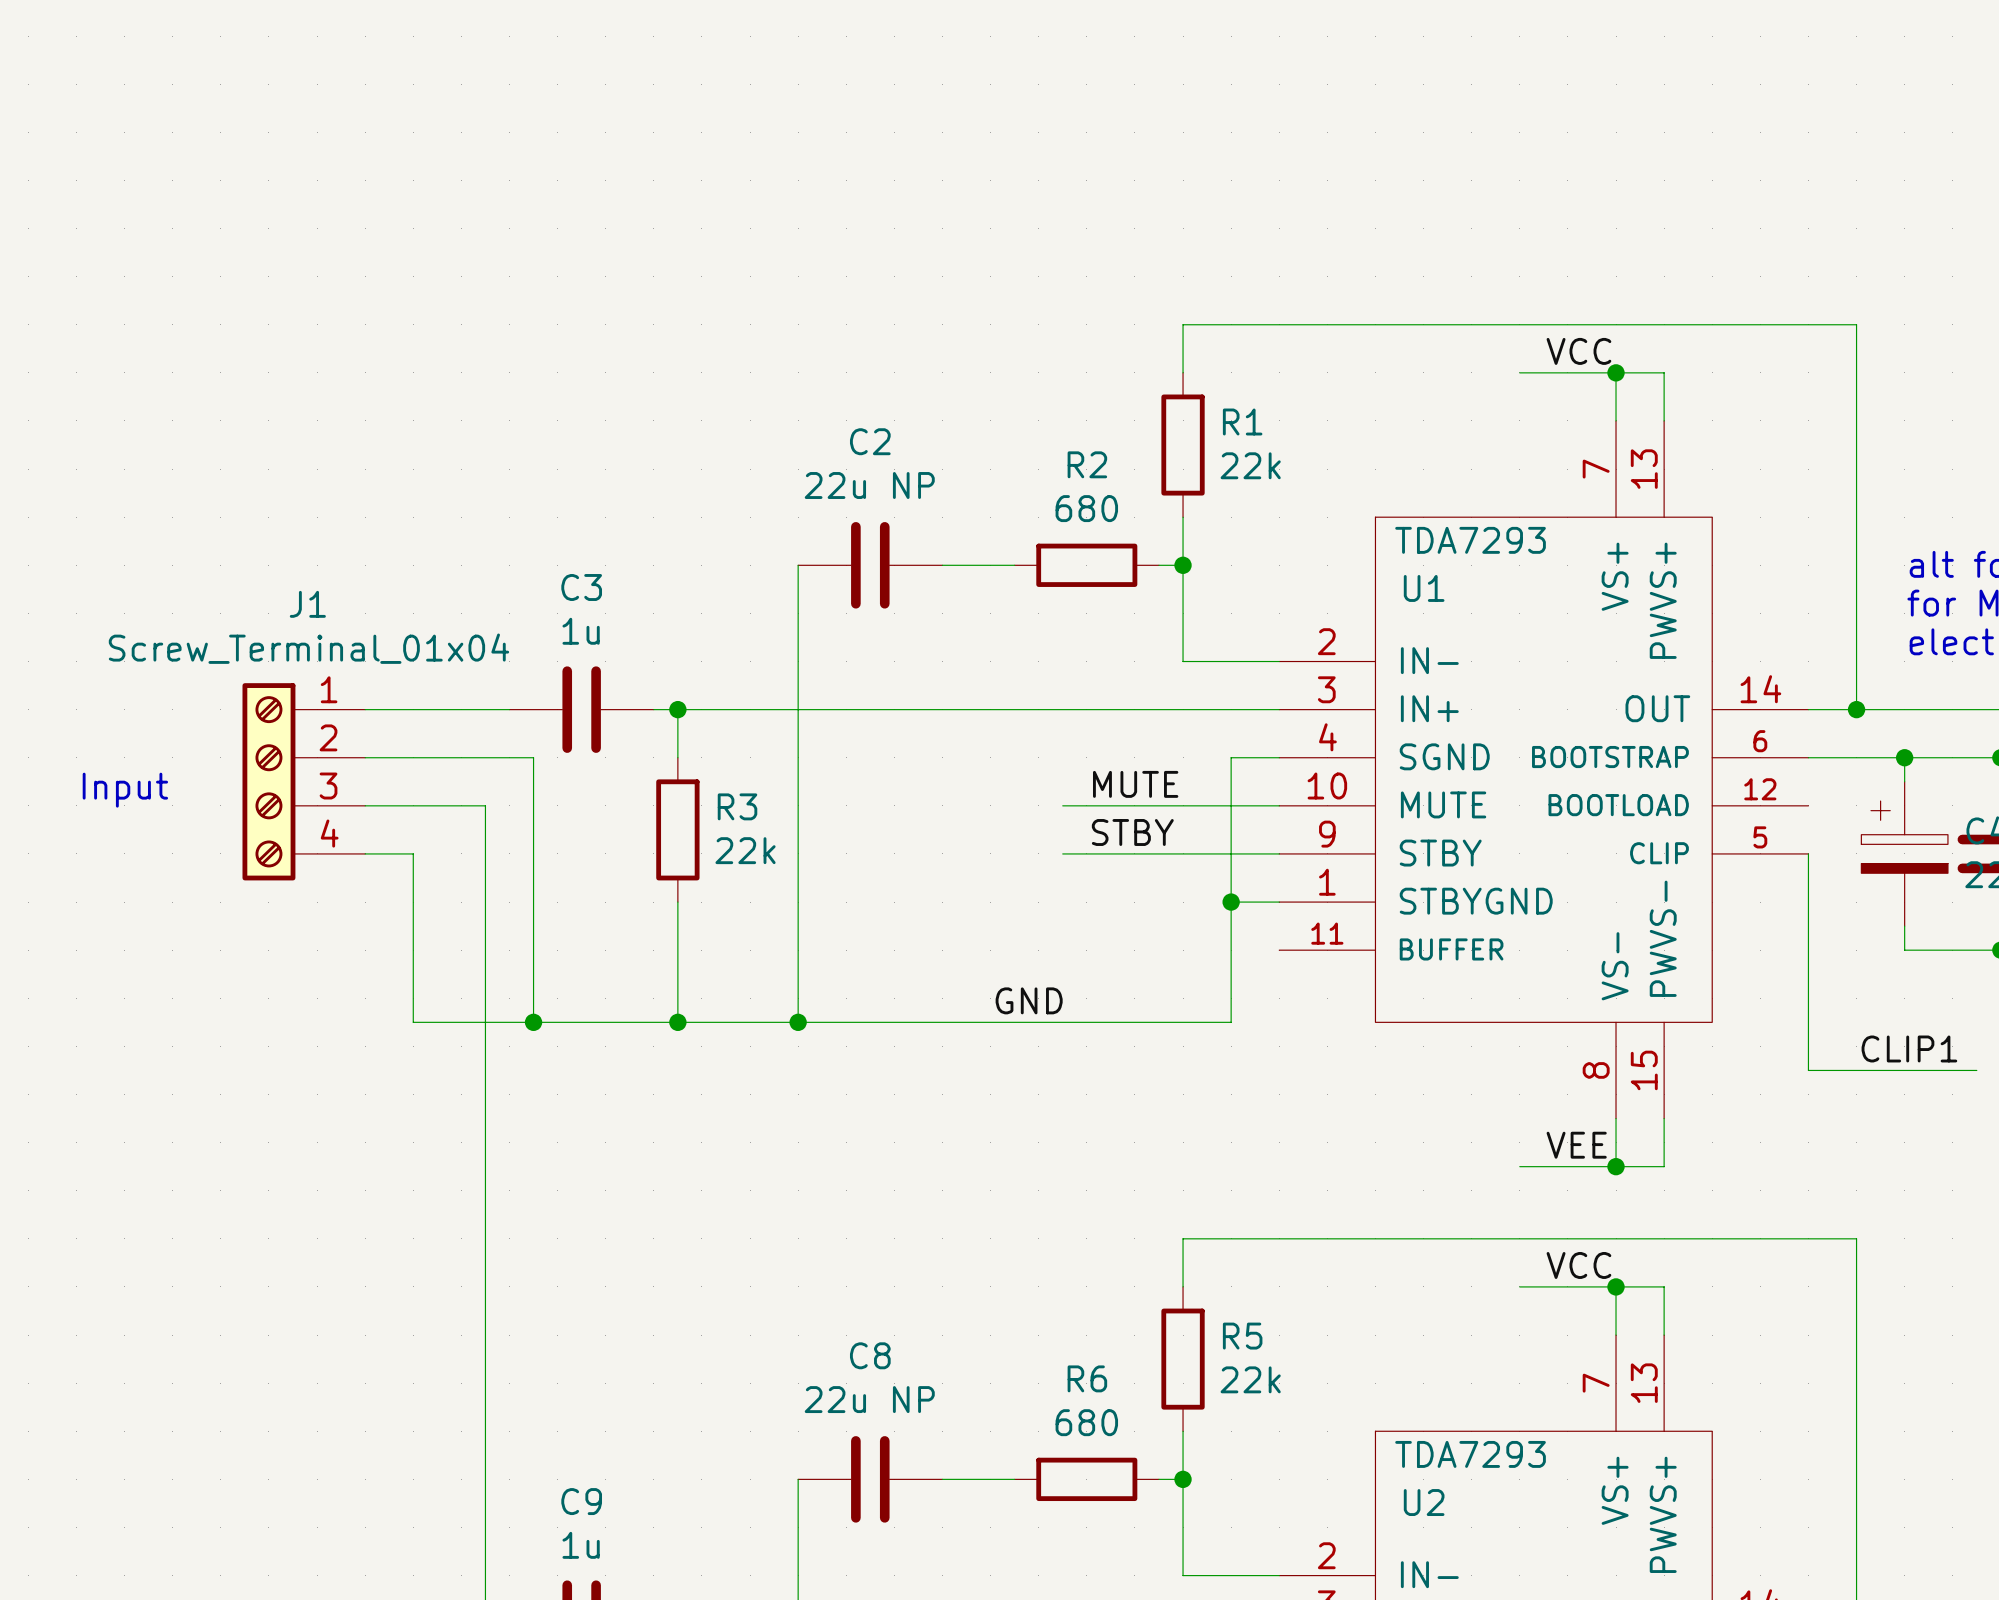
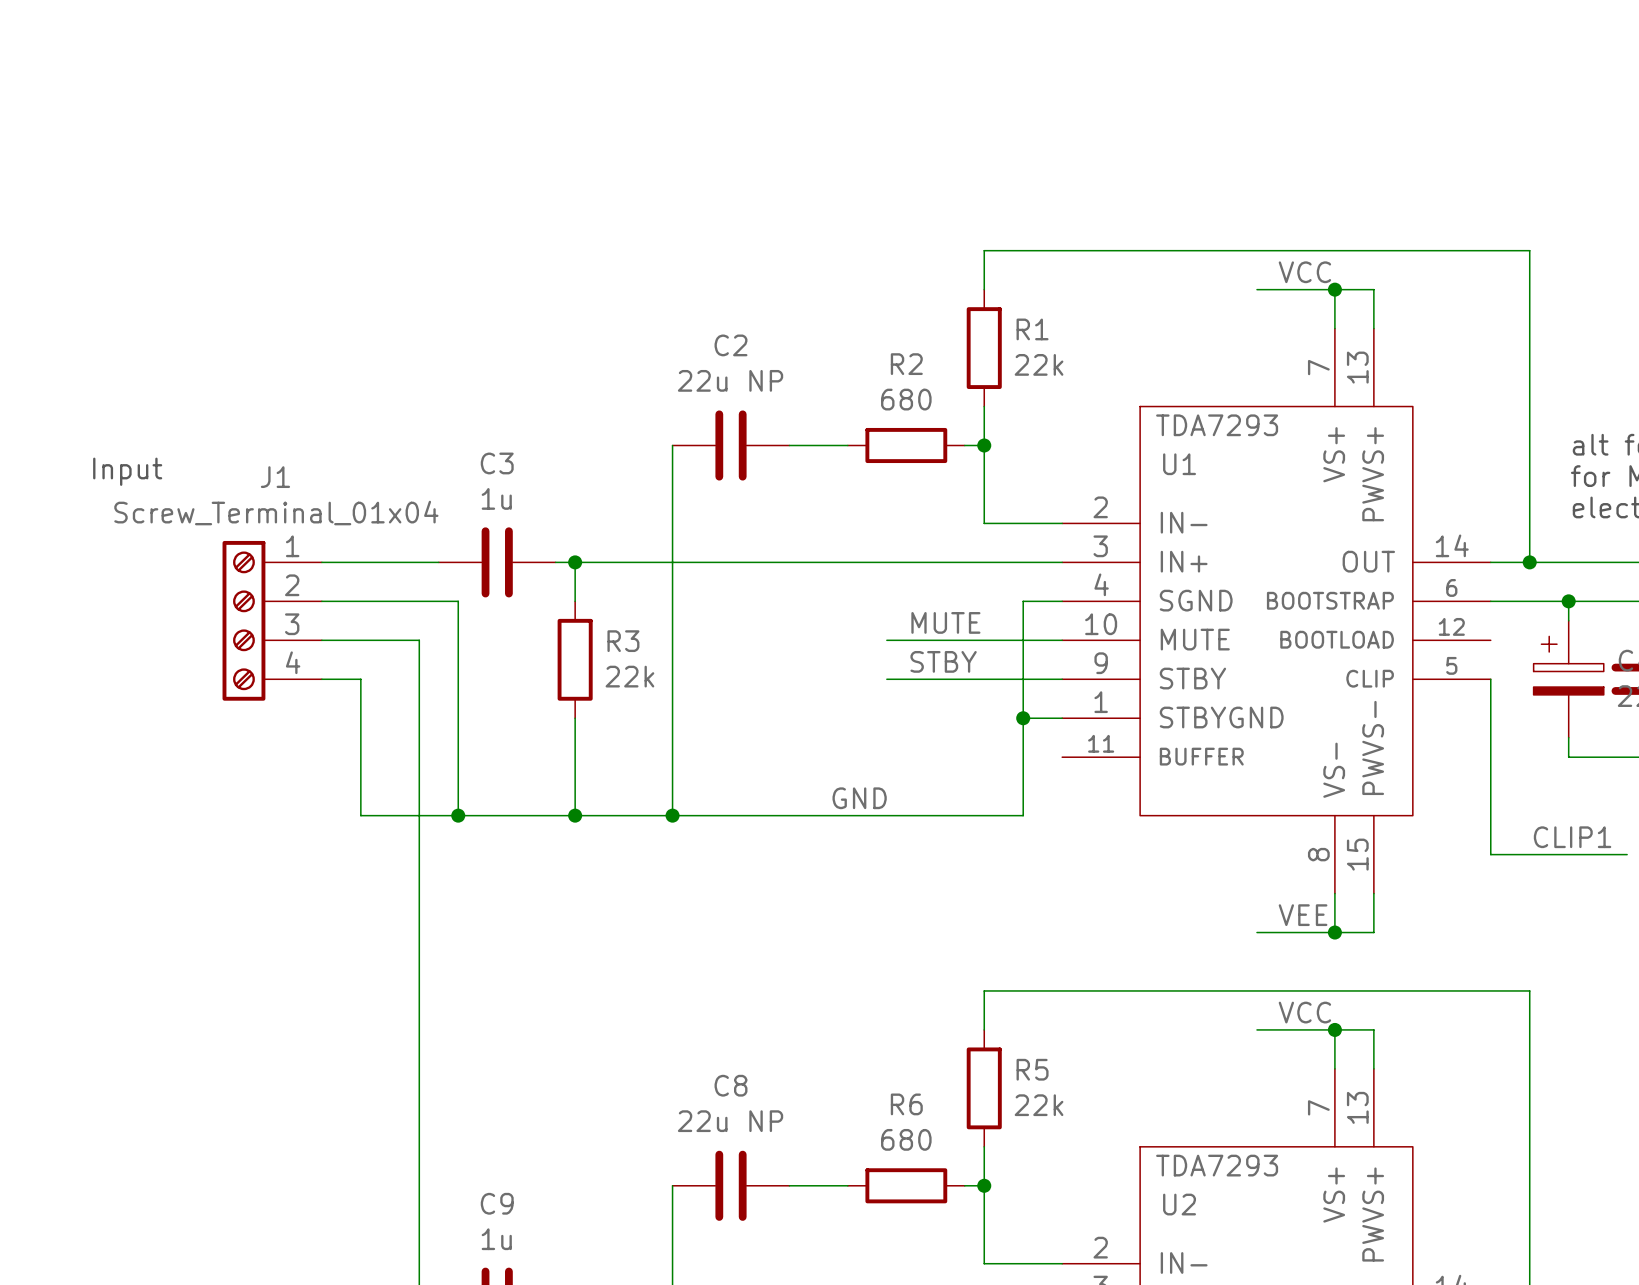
text position: Input (125, 790) -> Input (127, 471)

